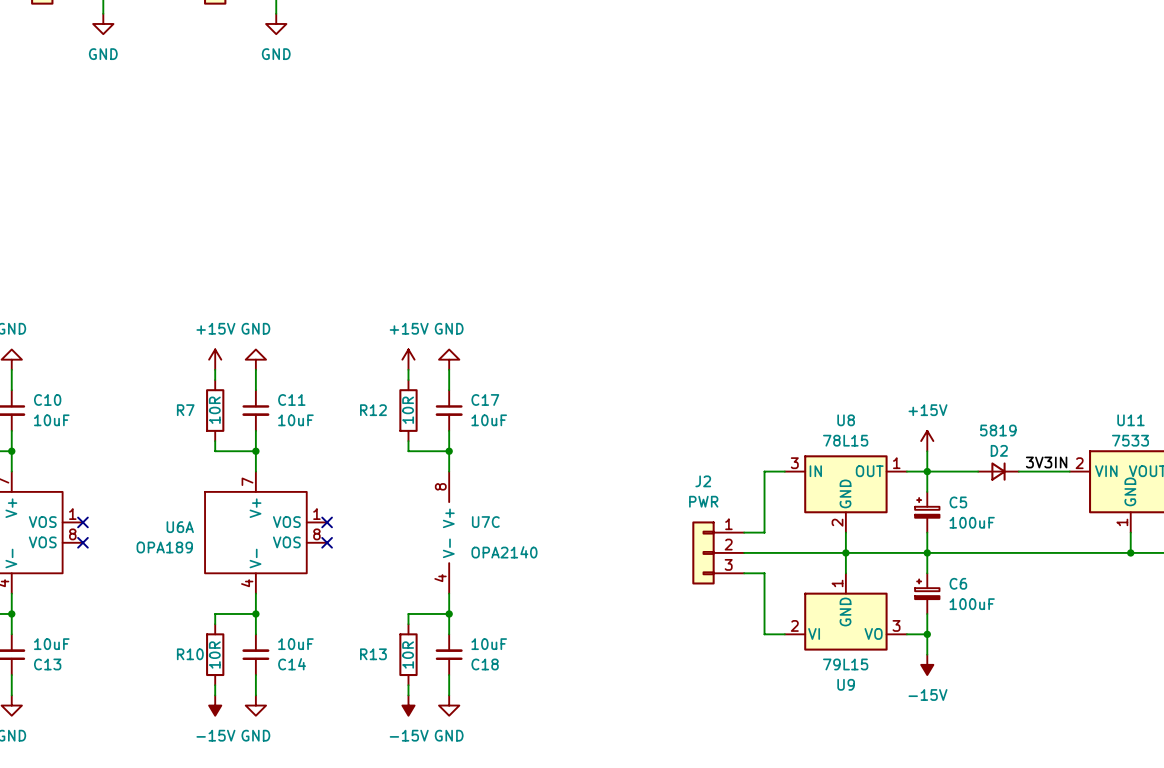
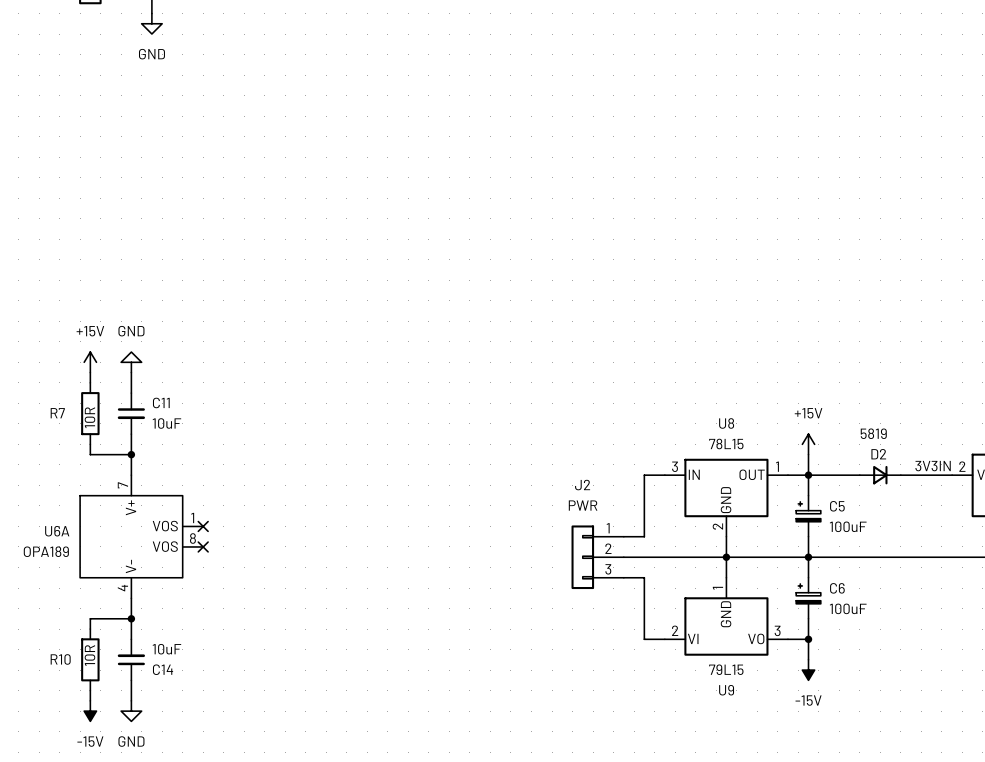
power symbol: +15V (408, 359) -> none
power symbol: GND (449, 359) -> none
wire: (408, 369) (408, 380) -> none
wire: (449, 369) (449, 390) -> none
R12: 10R (408, 410) -> none
C17: 10uF (449, 410) -> none
wire: (449, 430) (449, 471) -> none
wire: (408, 441) (408, 451) (449, 451) -> none
junction: (449, 451) -> none
U7C: OPA2140 (449, 532) -> none
wire: (449, 593) (449, 634) -> none
wire: (449, 613) (408, 613) (408, 624) -> none
junction: (449, 613) -> none
R13: 10R (408, 654) -> none
C18: 10uF (449, 654) -> none
wire: (449, 675) (449, 695) -> none
wire: (408, 685) (408, 695) -> none
power symbol: -15V (408, 705) -> none
power symbol: GND (449, 705) -> none

